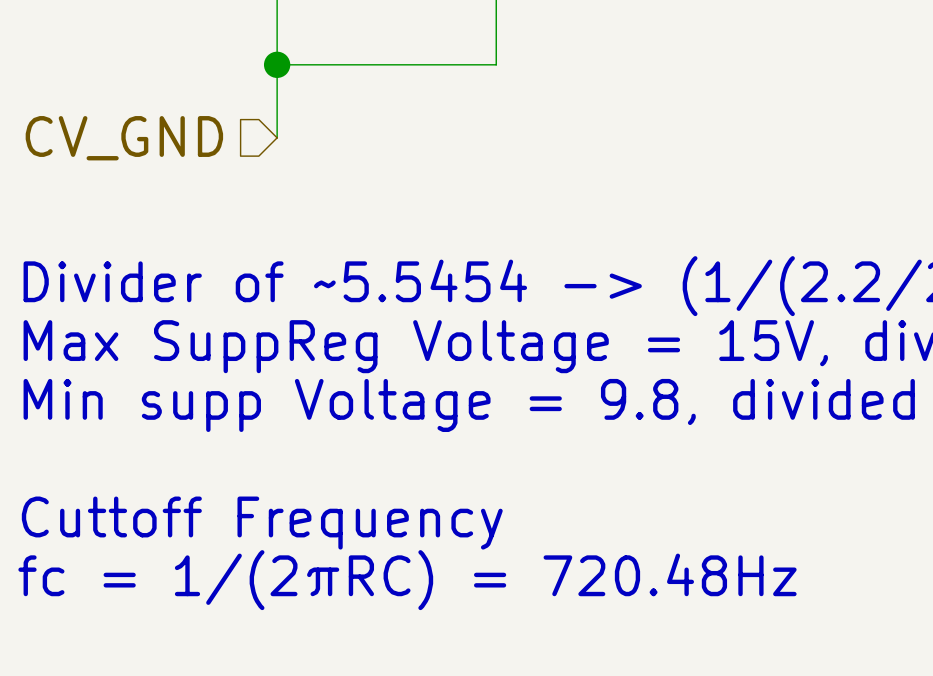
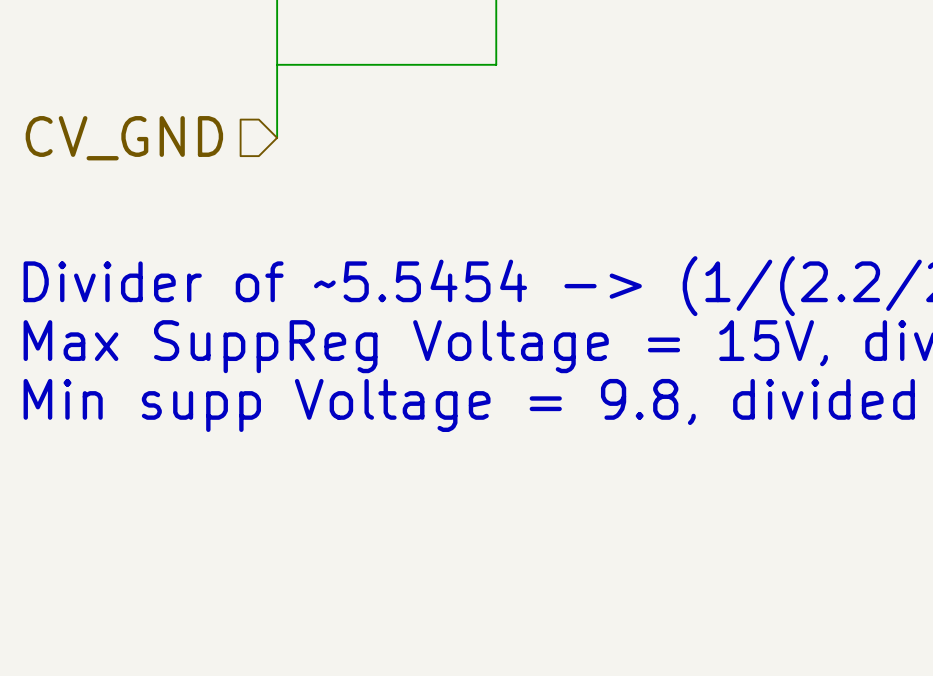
junction: (277, 64) -> none
text: Cuttoff Frequency (262, 523) -> none
text: fc = 1/(2πRC) = 720.48Hz (407, 580) -> none

